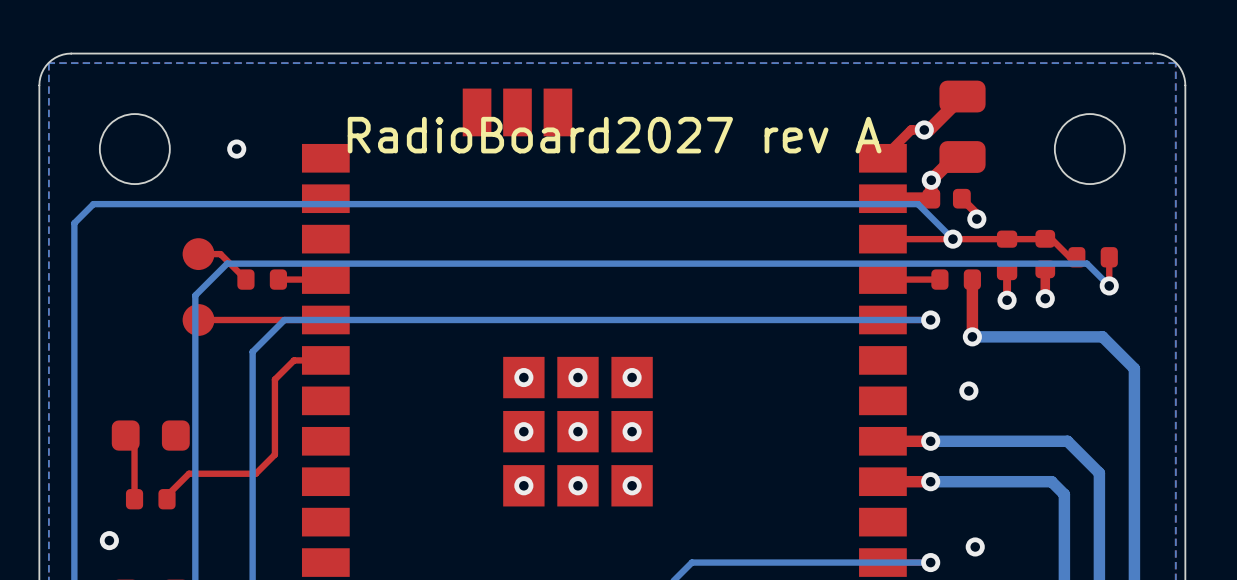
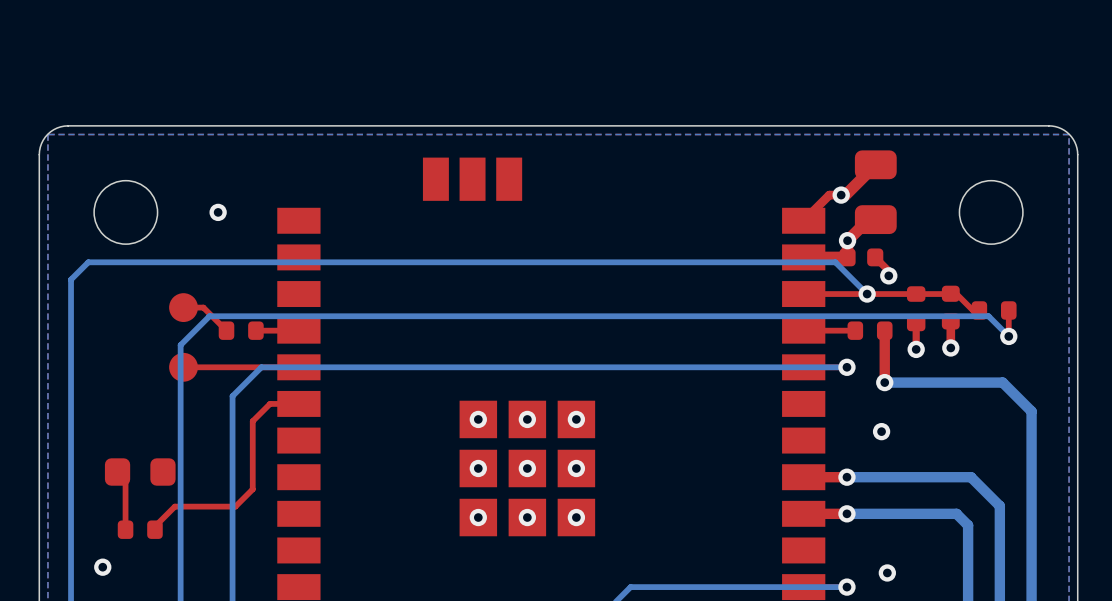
text: RadioBoard2027 rev A (614, 135) -> none

